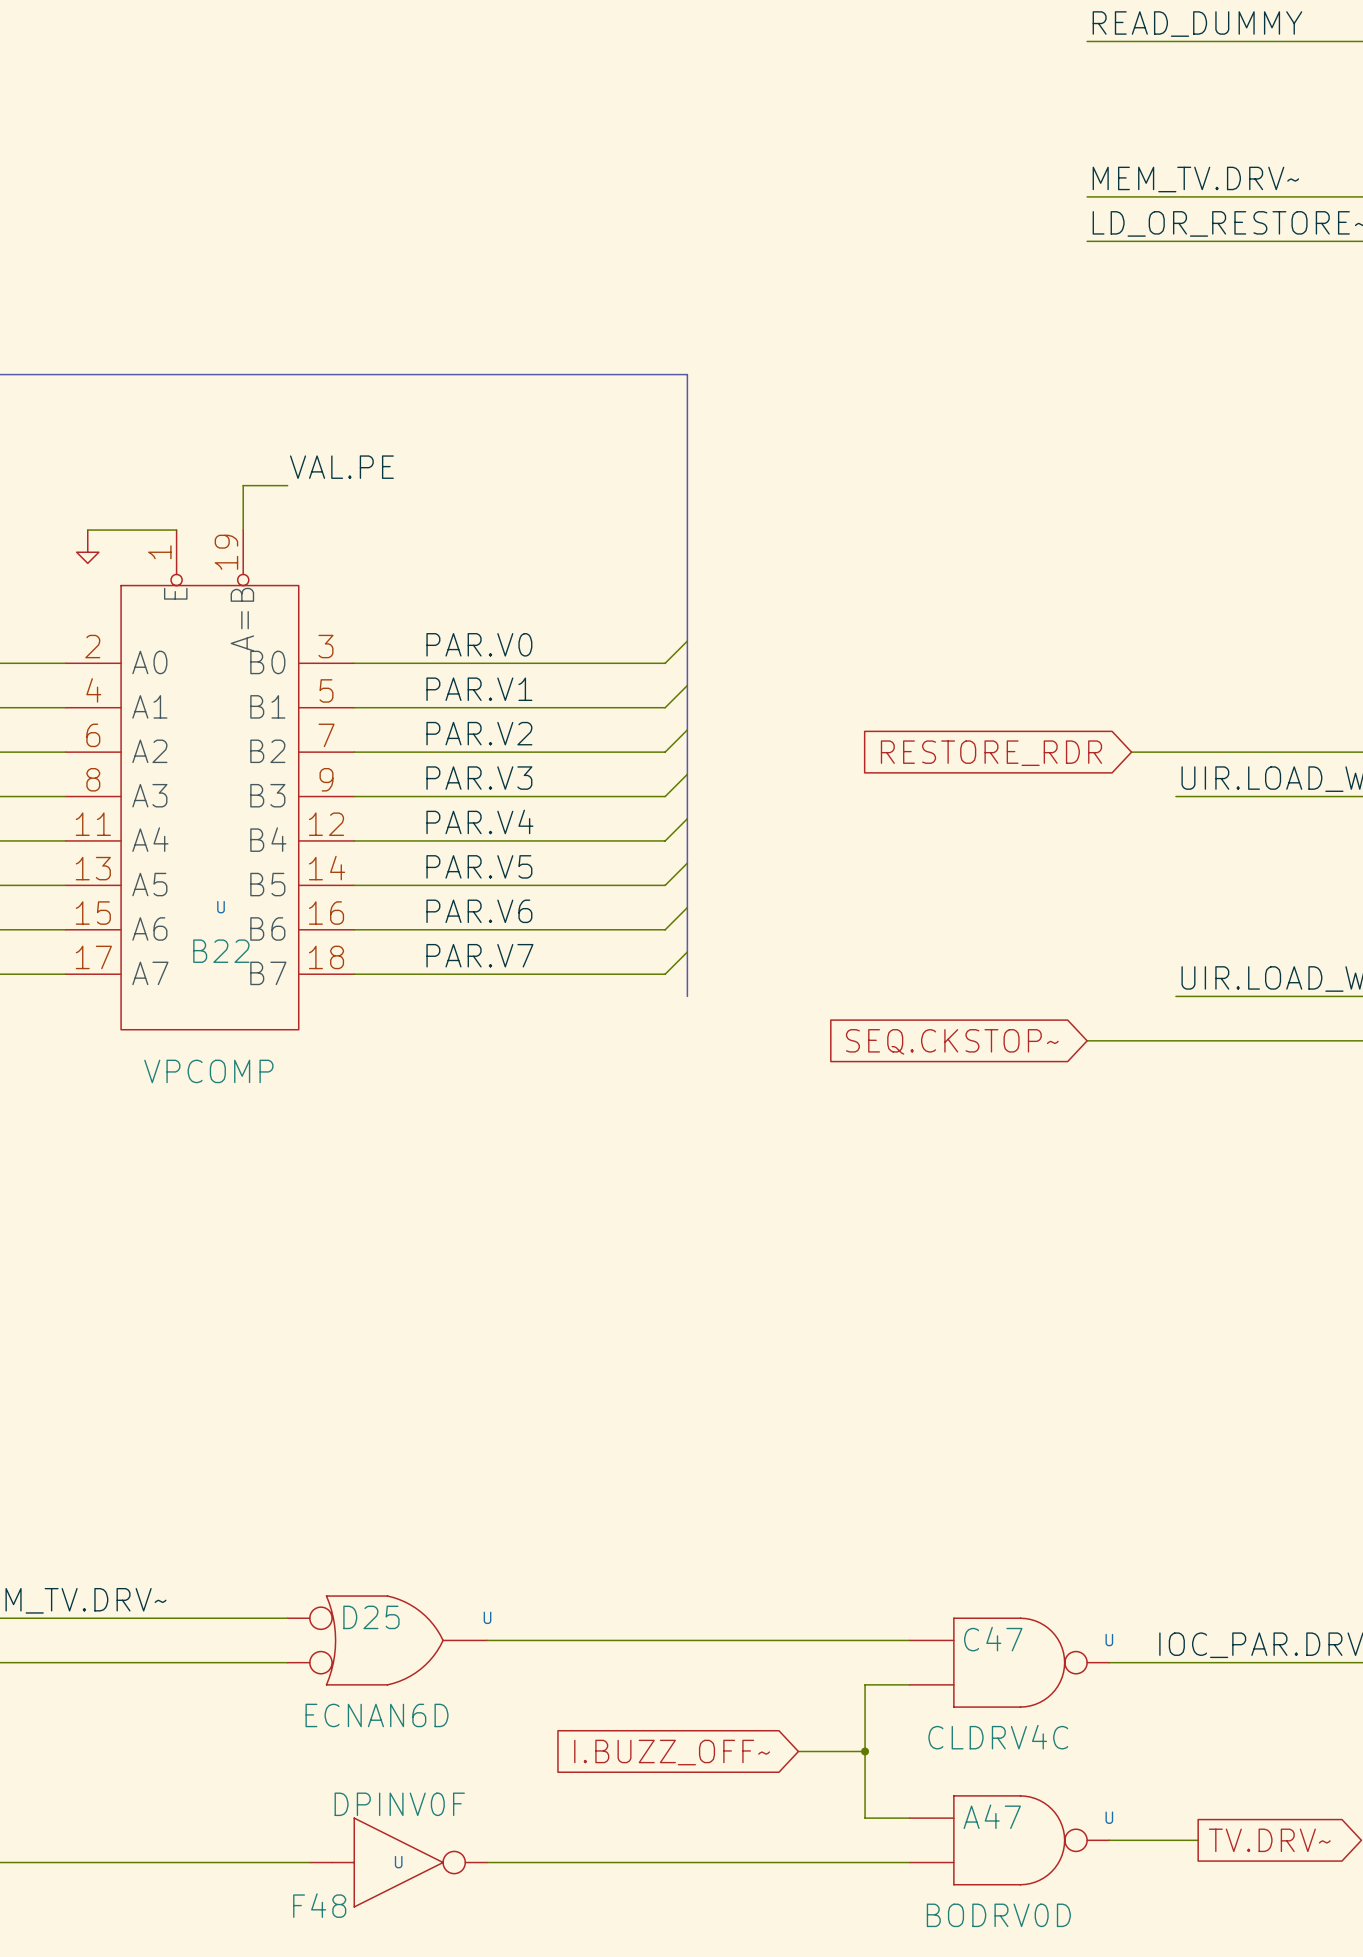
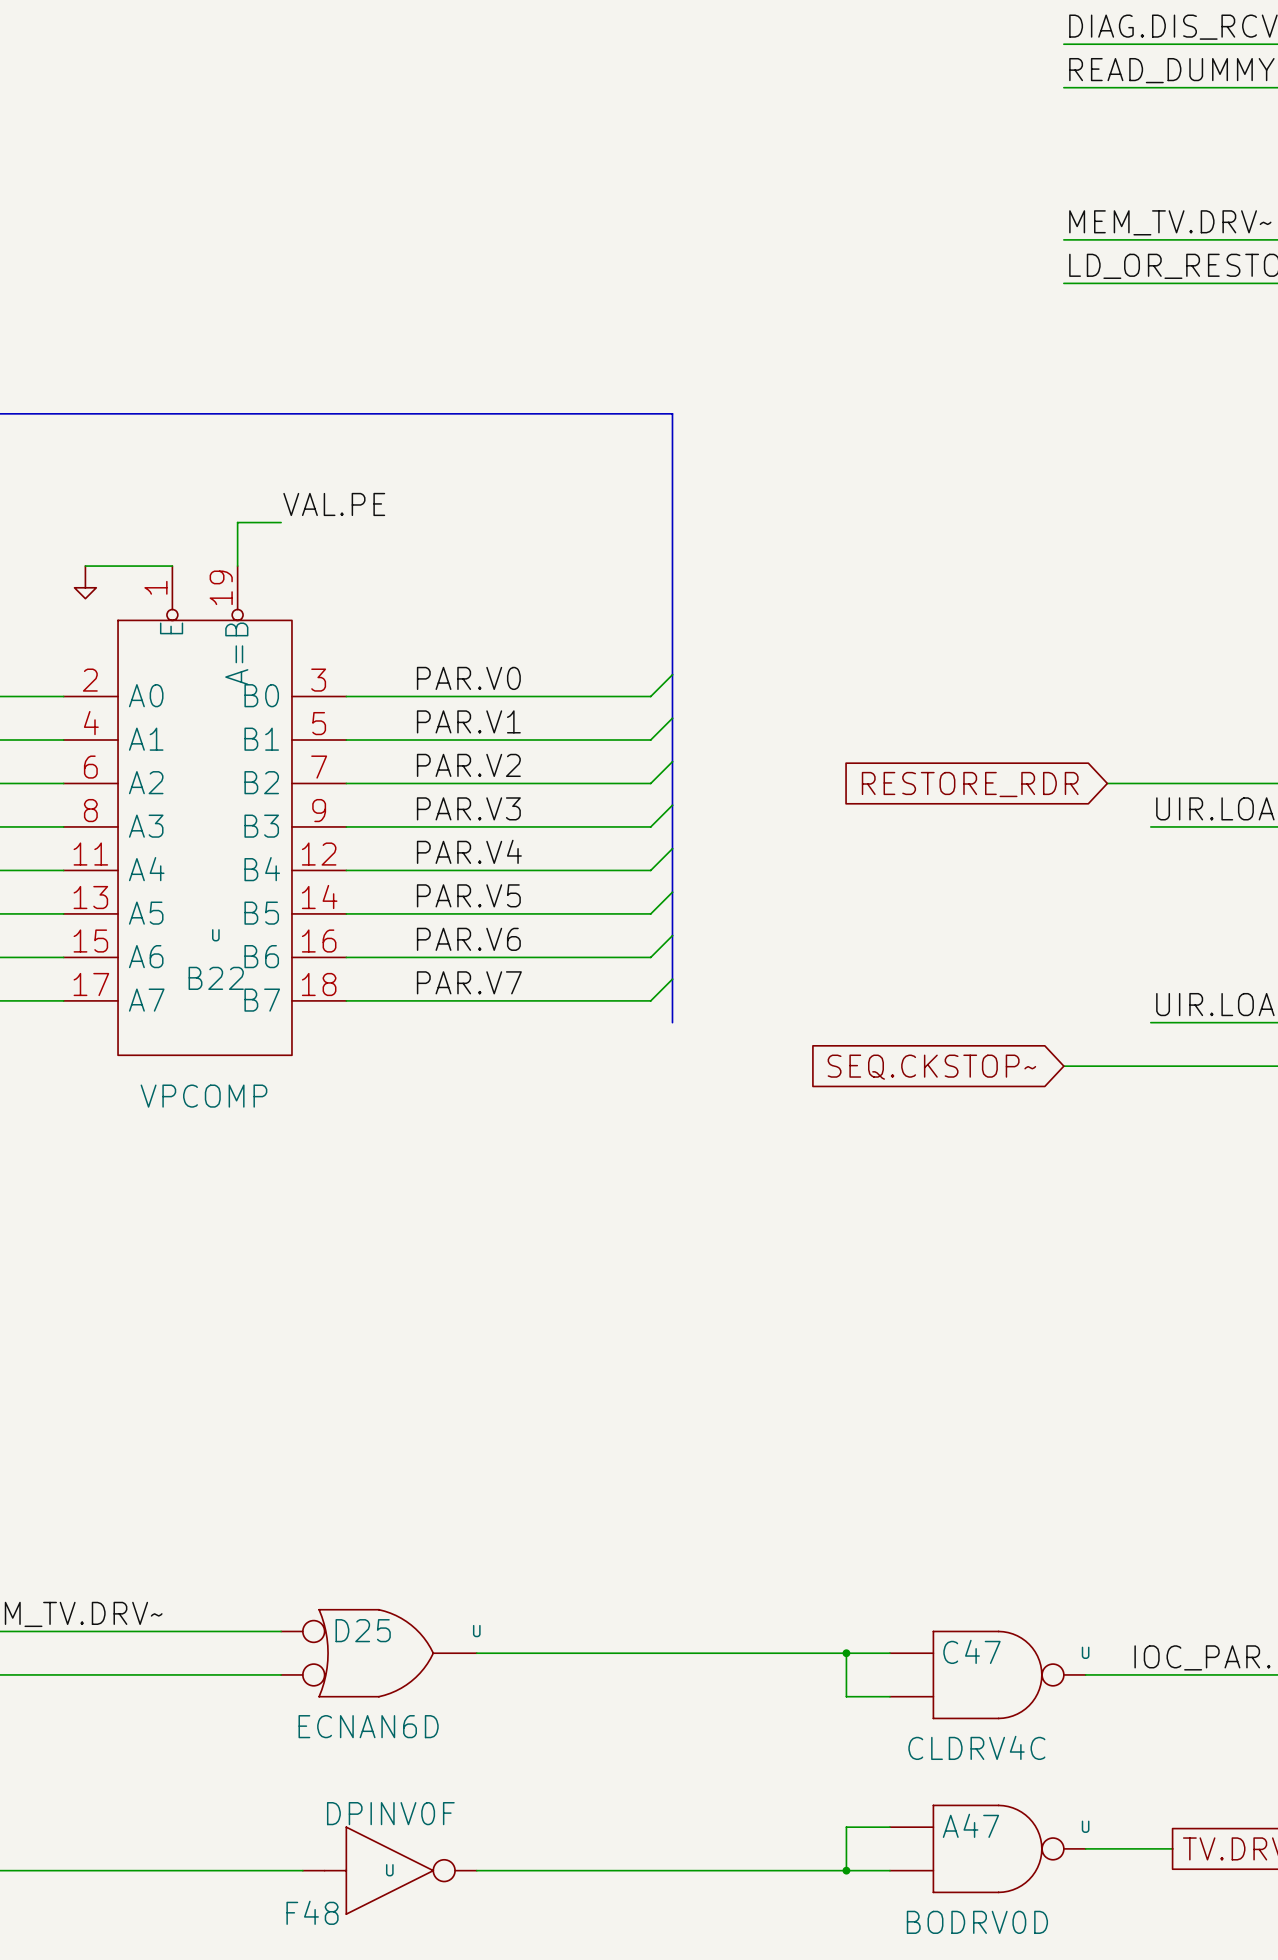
wire: none -> (846, 1653) (846, 1696)
junction: none -> (846, 1653)
wire: (865, 1684) (865, 1818) -> (846, 1870) (846, 1827)
wire: (798, 1751) (865, 1751) -> none
junction: (865, 1751) -> none
global label: I.BUZZ_OFF~ (672, 1752) -> none
junction: none -> (846, 1870)

